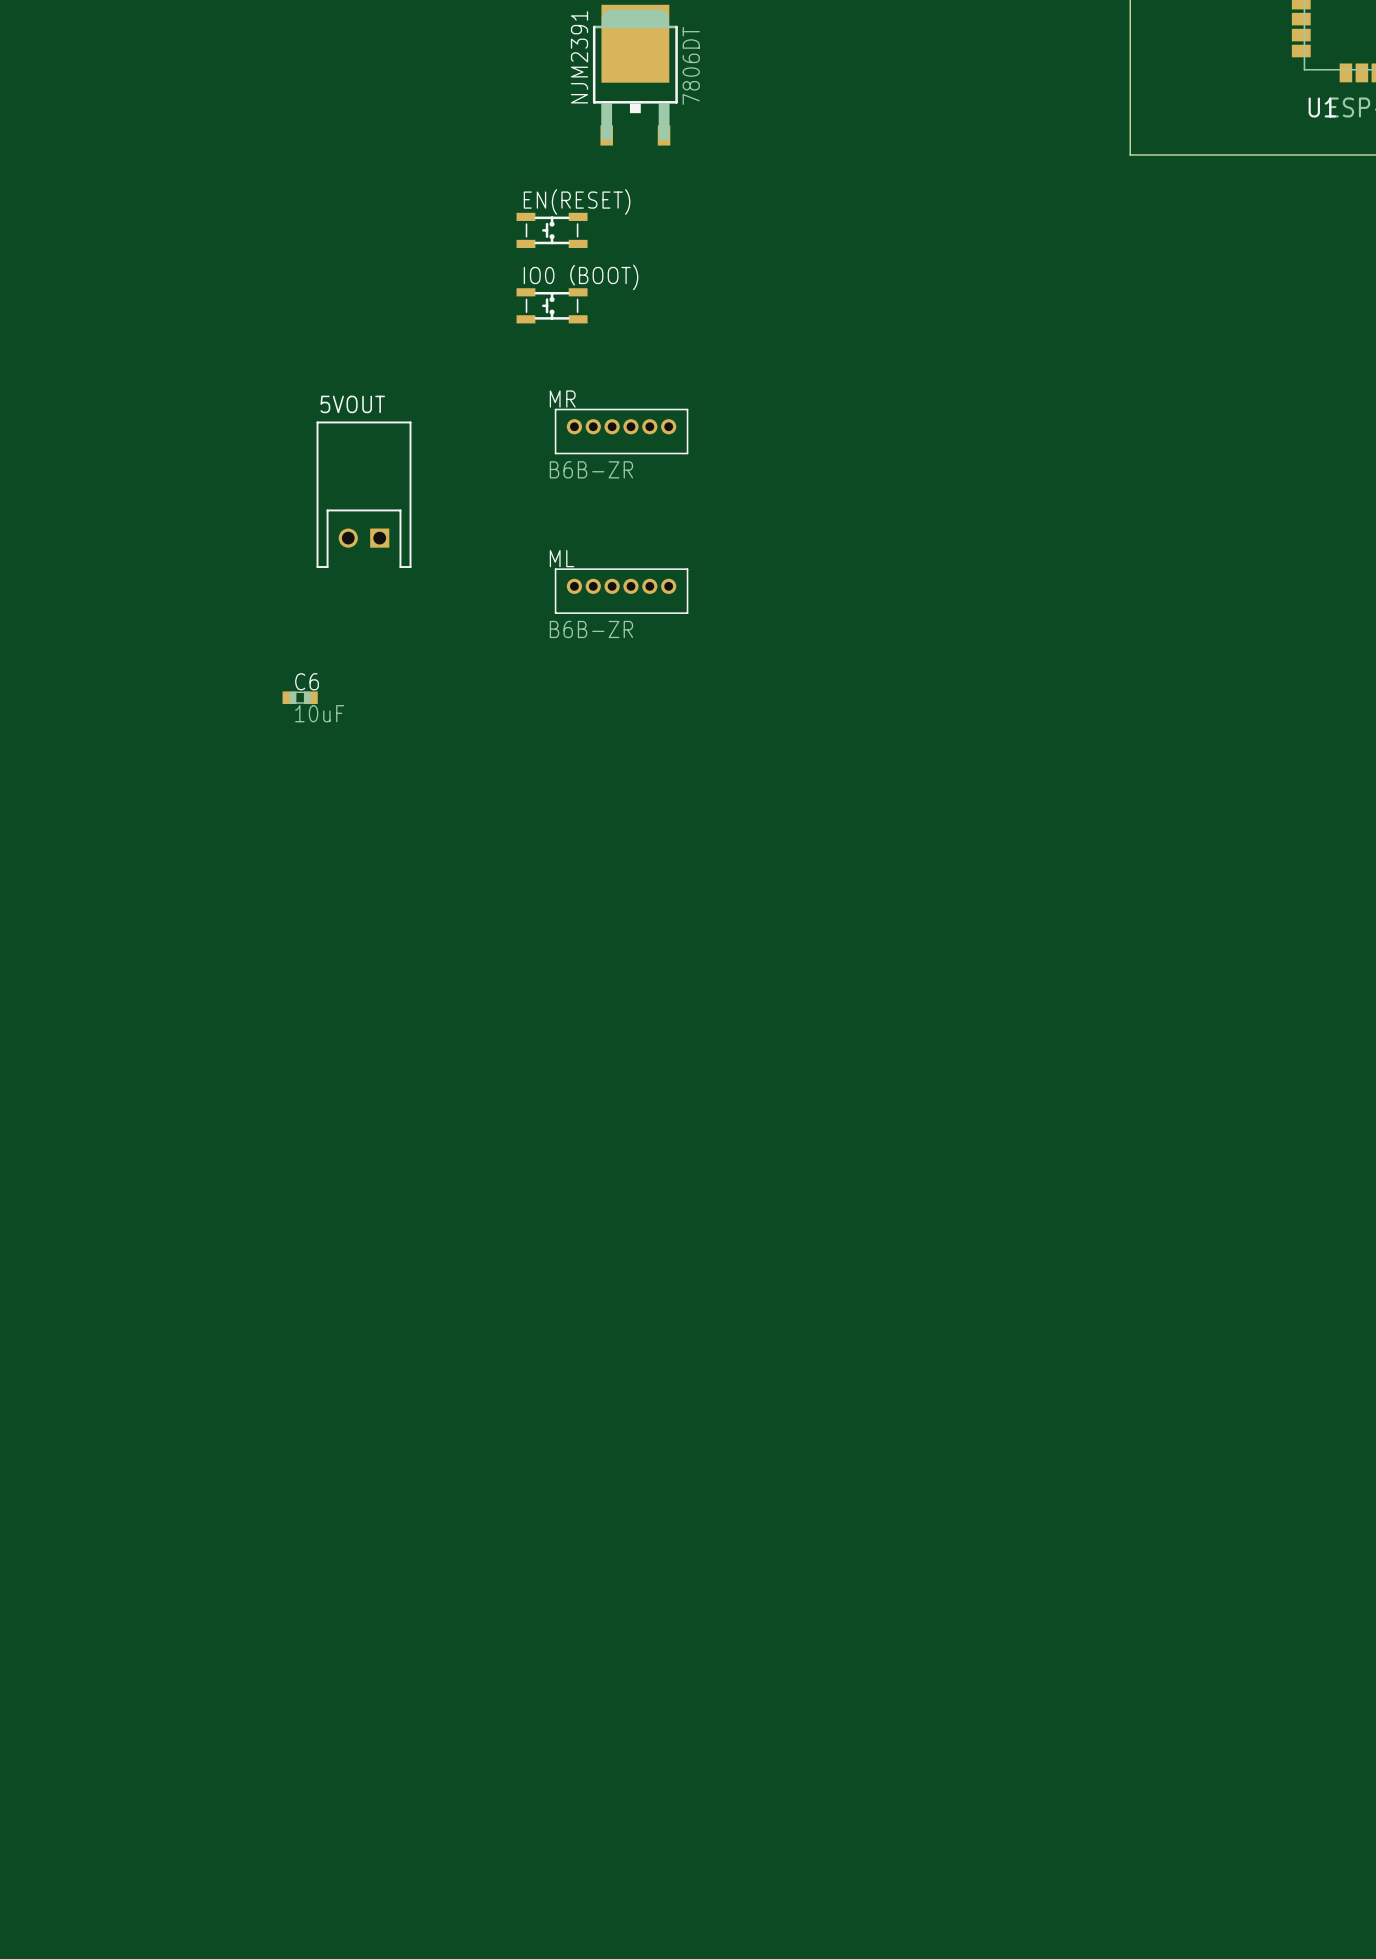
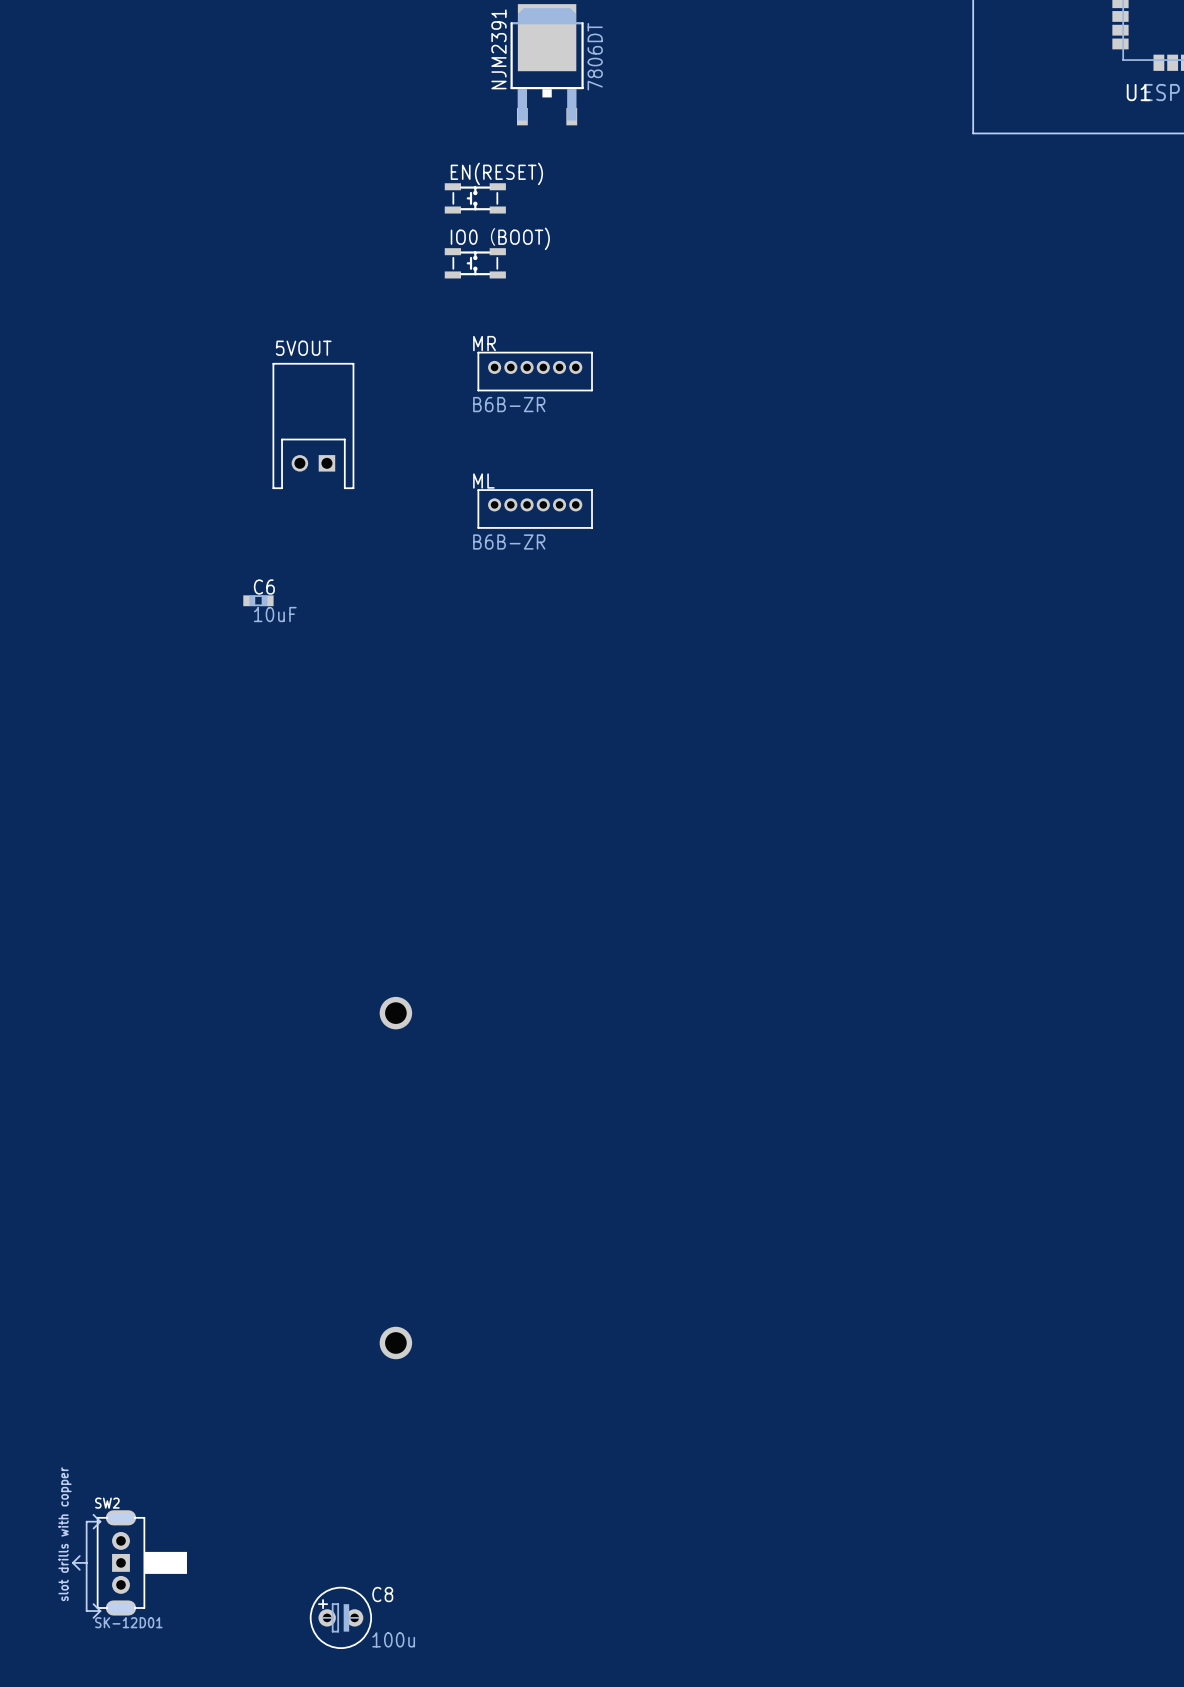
part: none -> (395, 1013)
part: none -> (395, 1342)
SW2: none -> SK-12D01 (129, 1564)
C8: none -> 100u (340, 1617)

